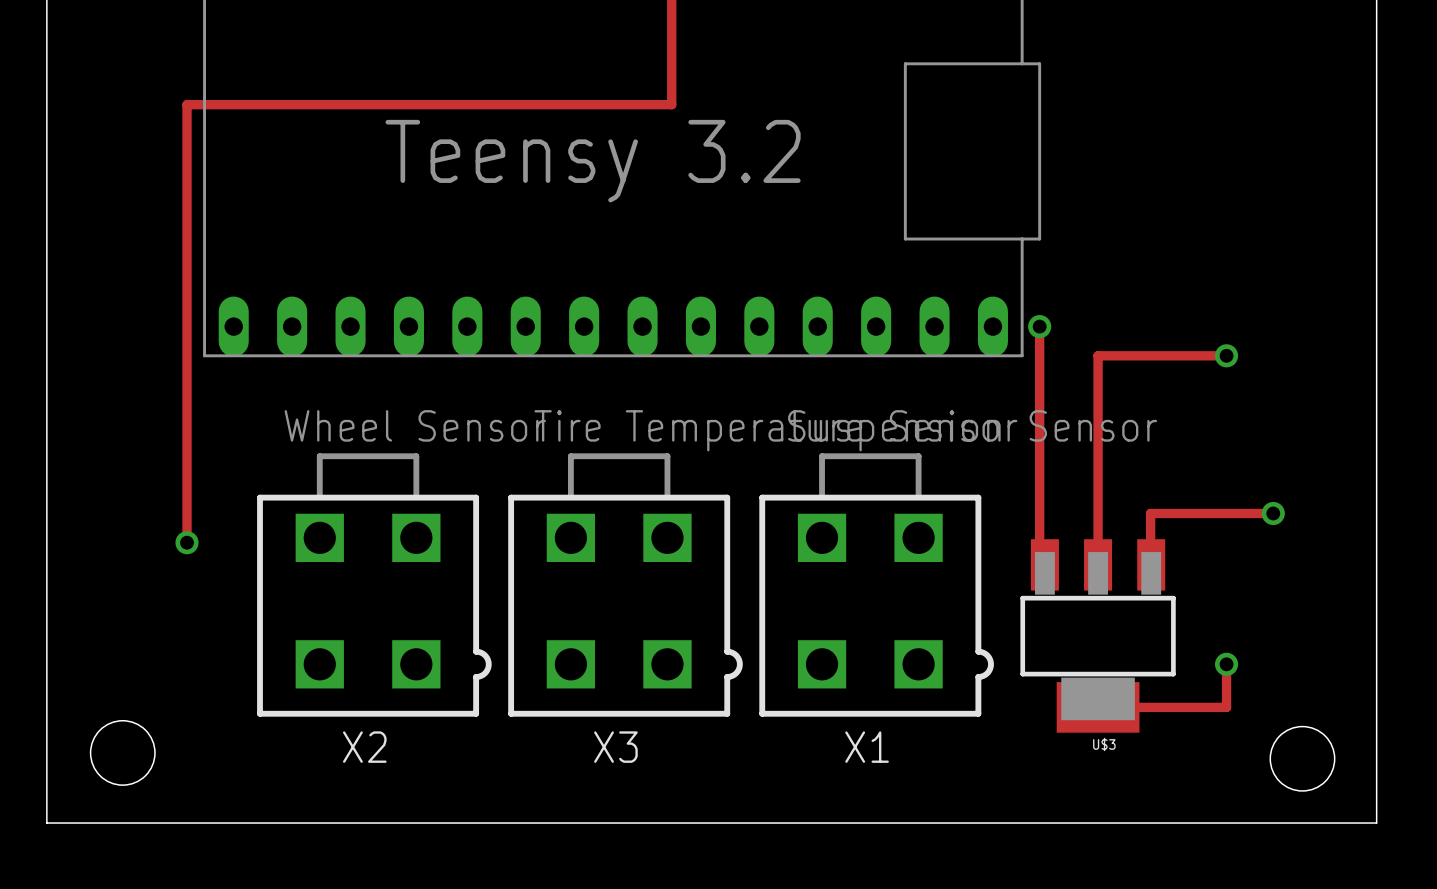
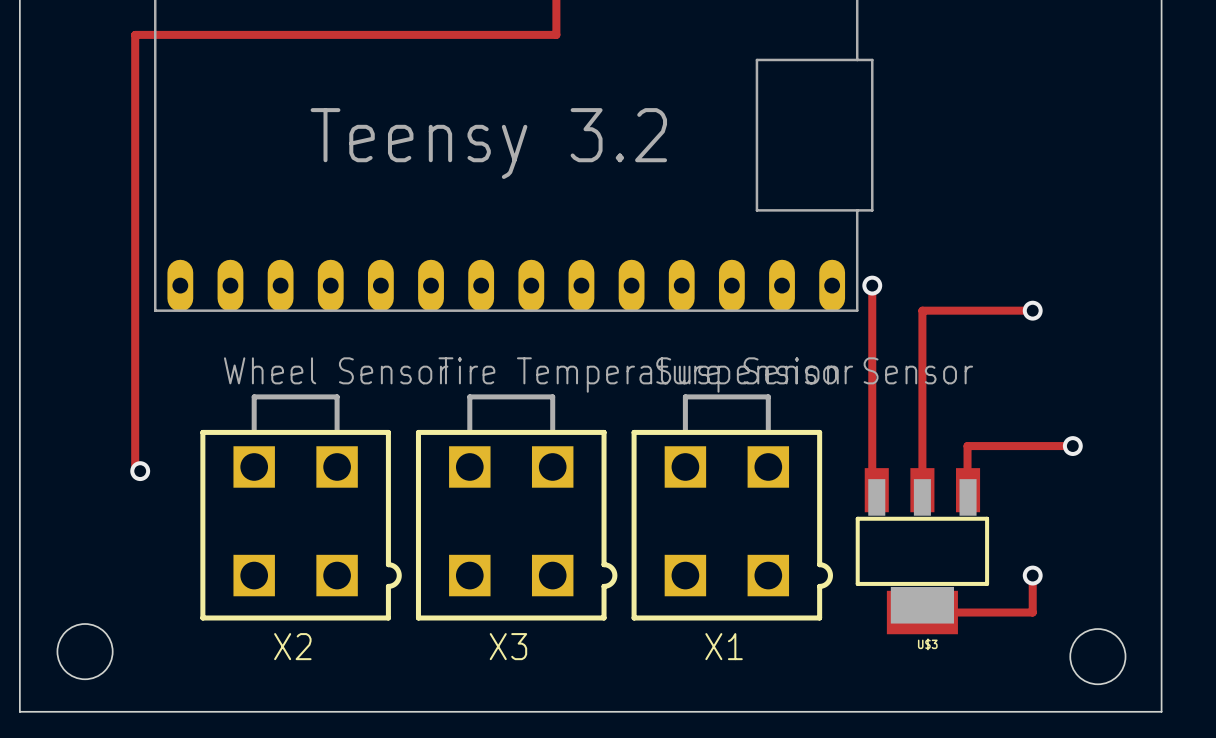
track: (671, 34) (671, 104) (187, 104) (187, 542) -> (556, 34) (135, 34) (135, 471)

